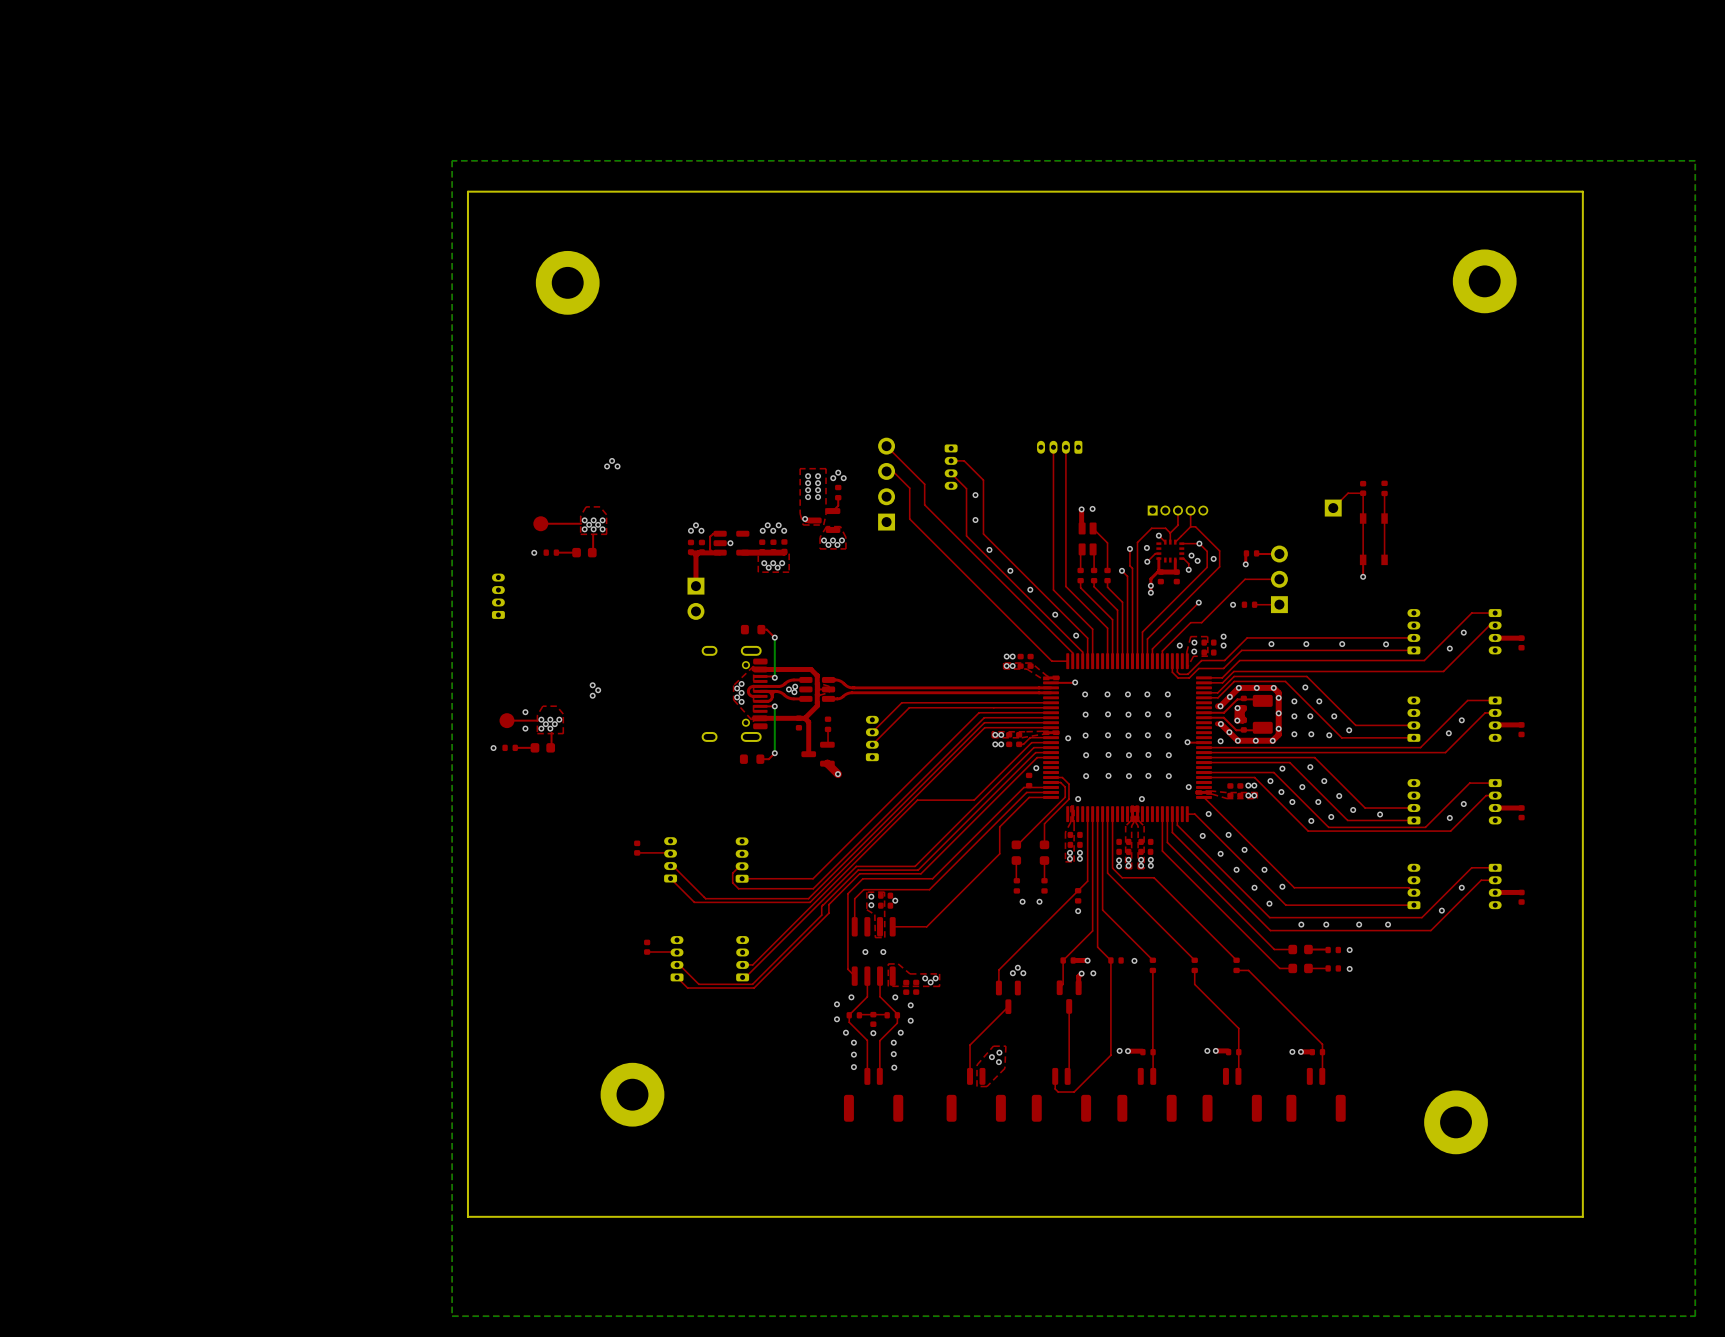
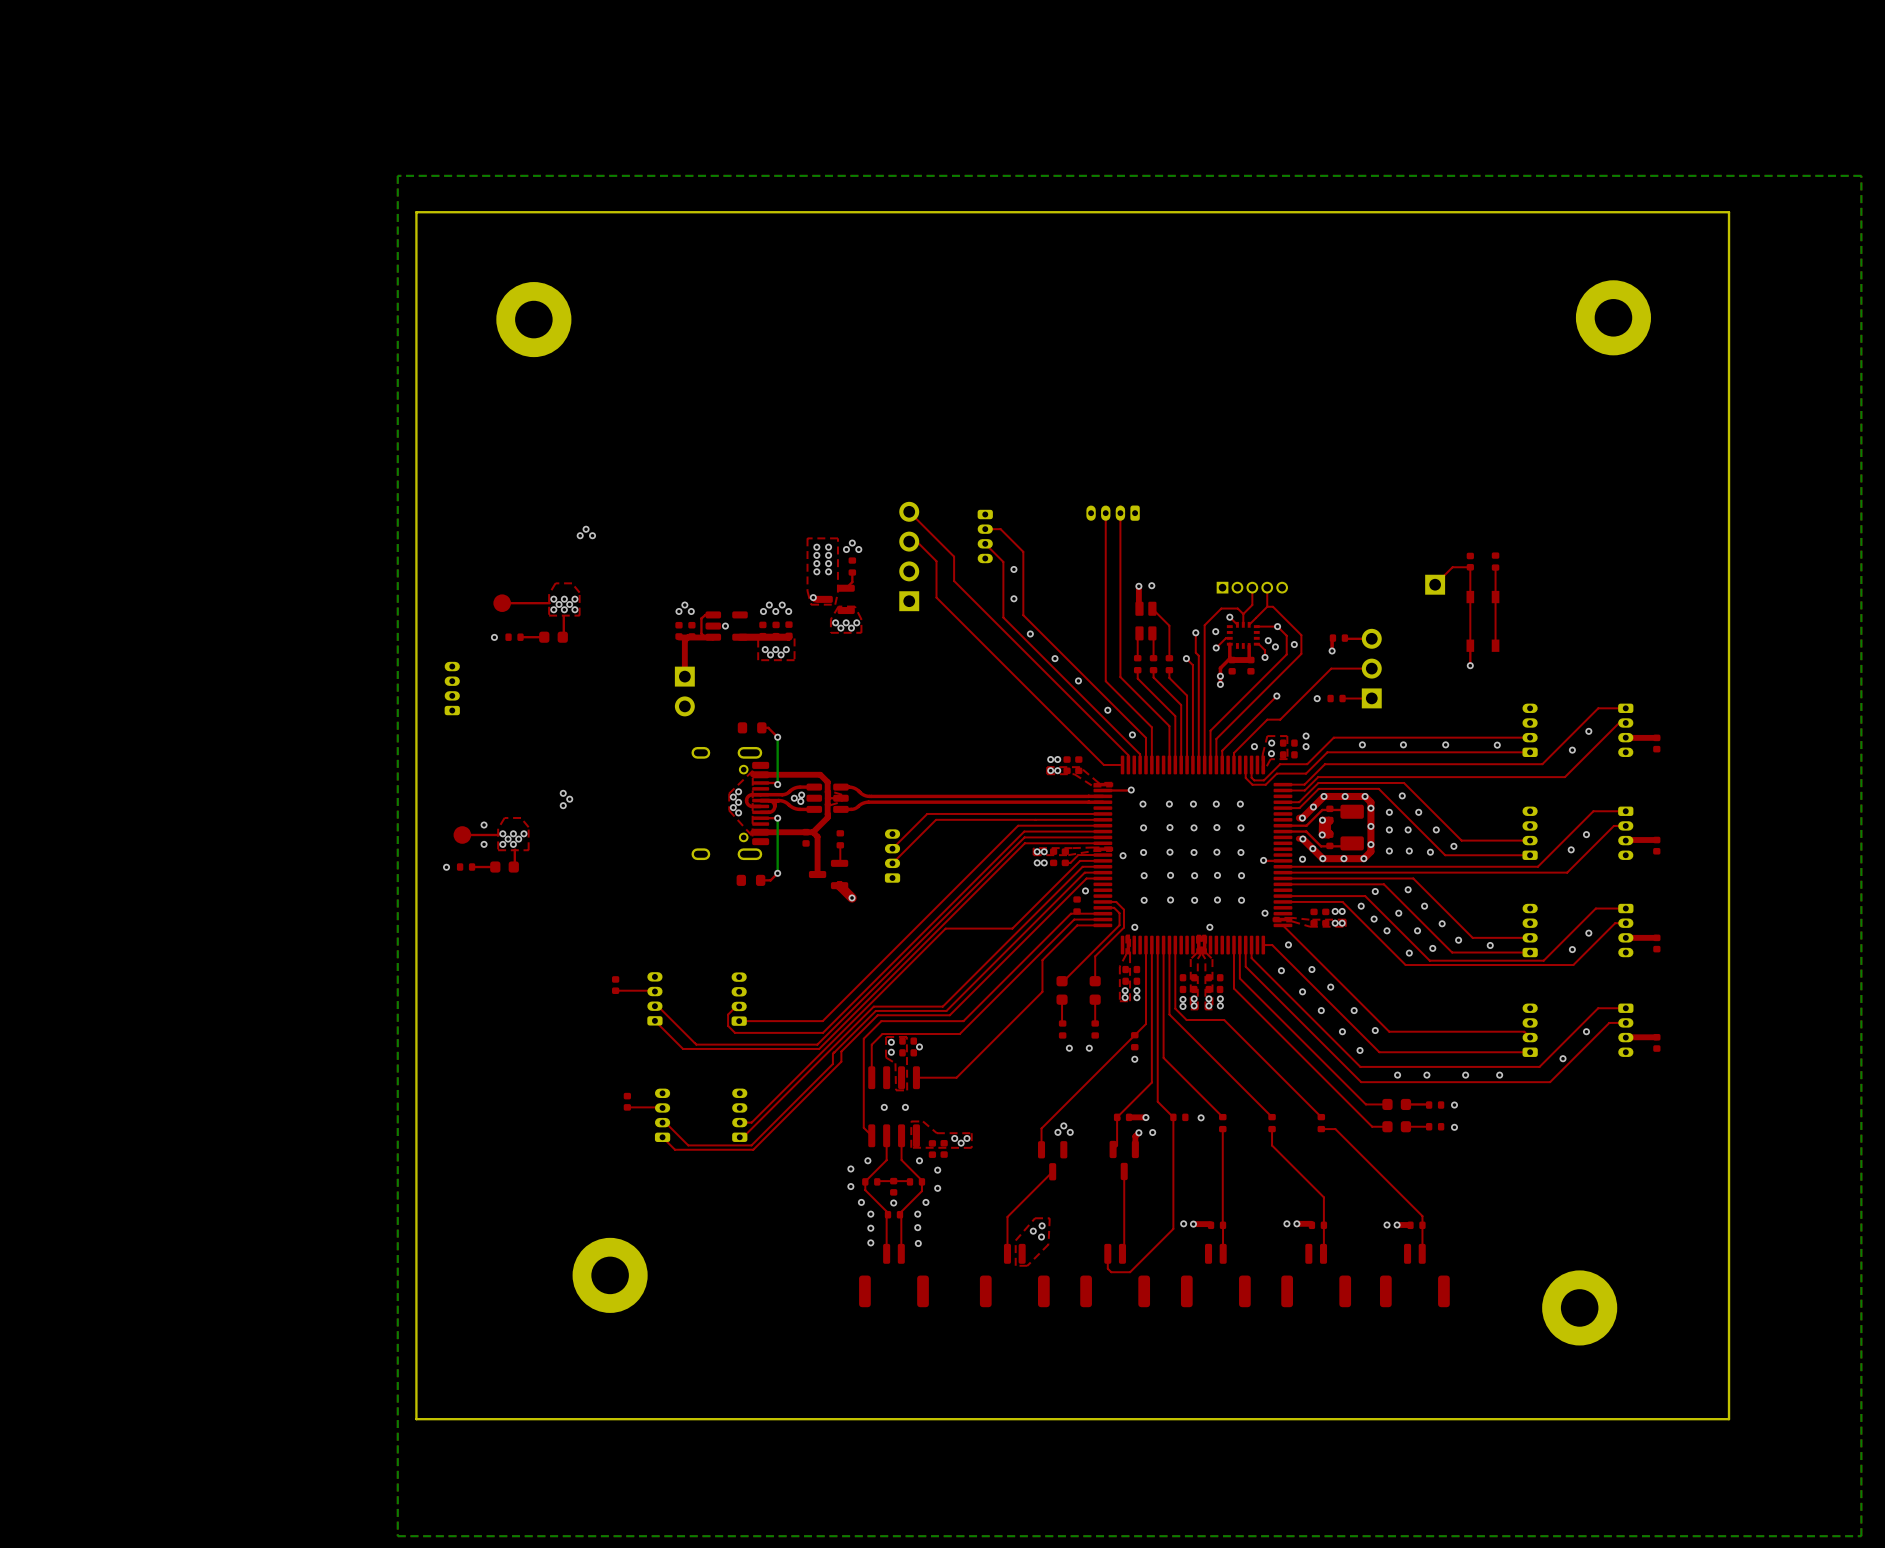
part: none -> (893, 1214)

